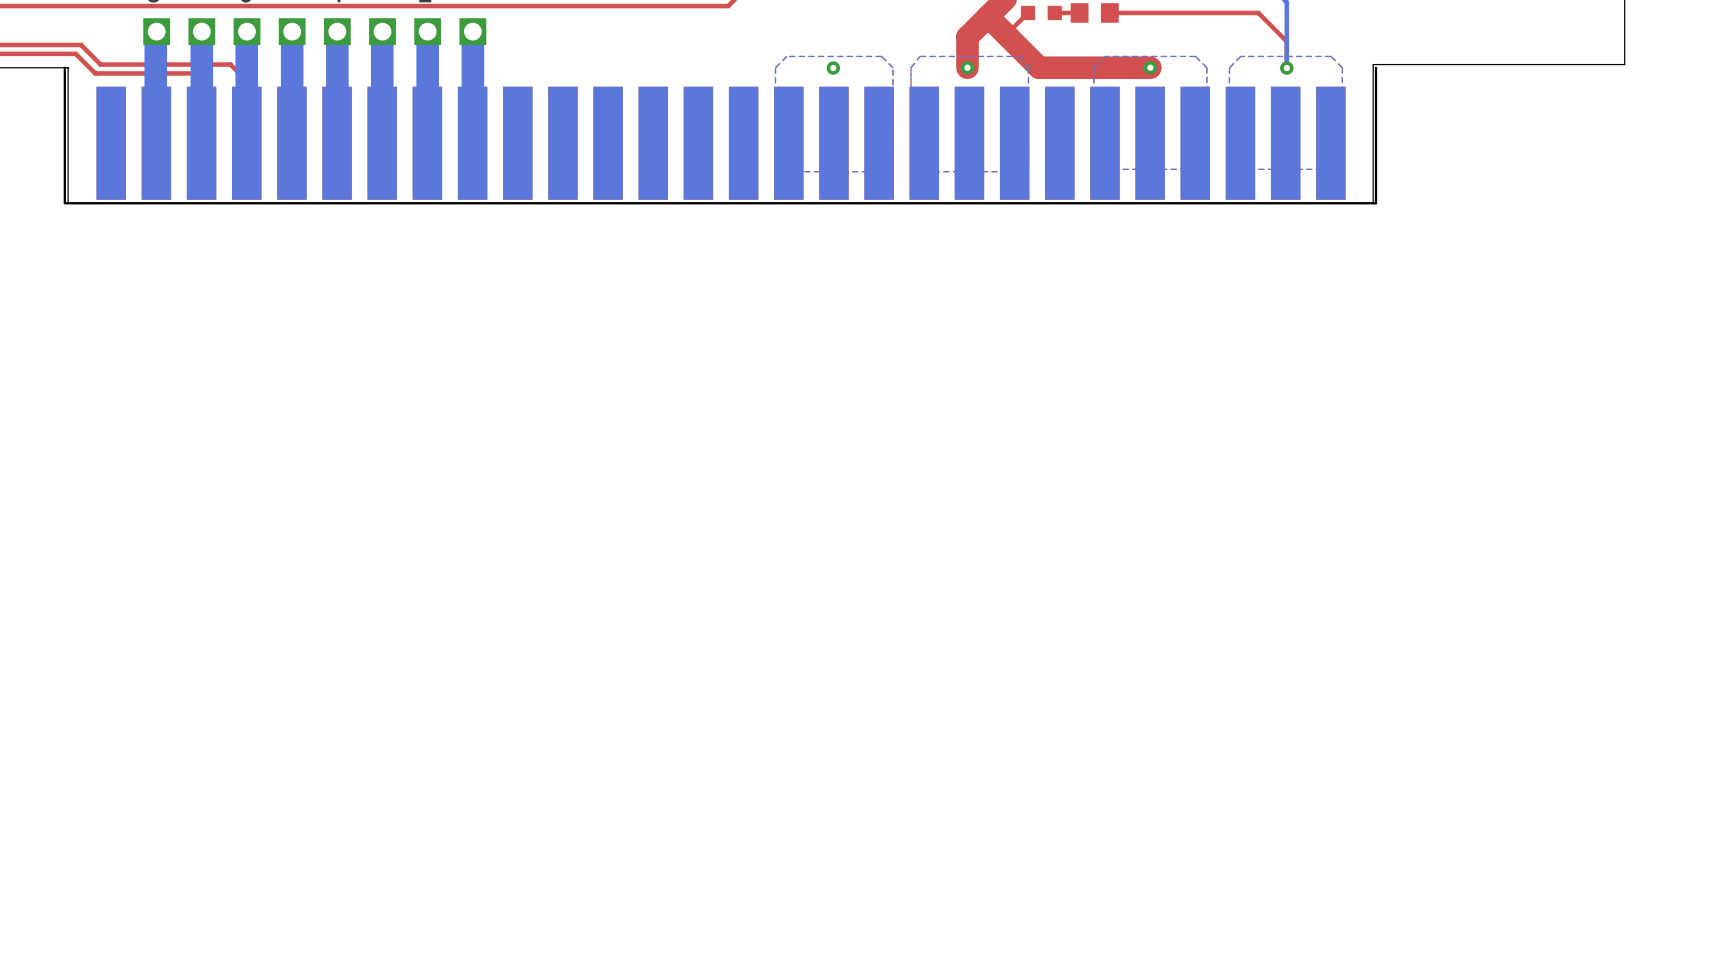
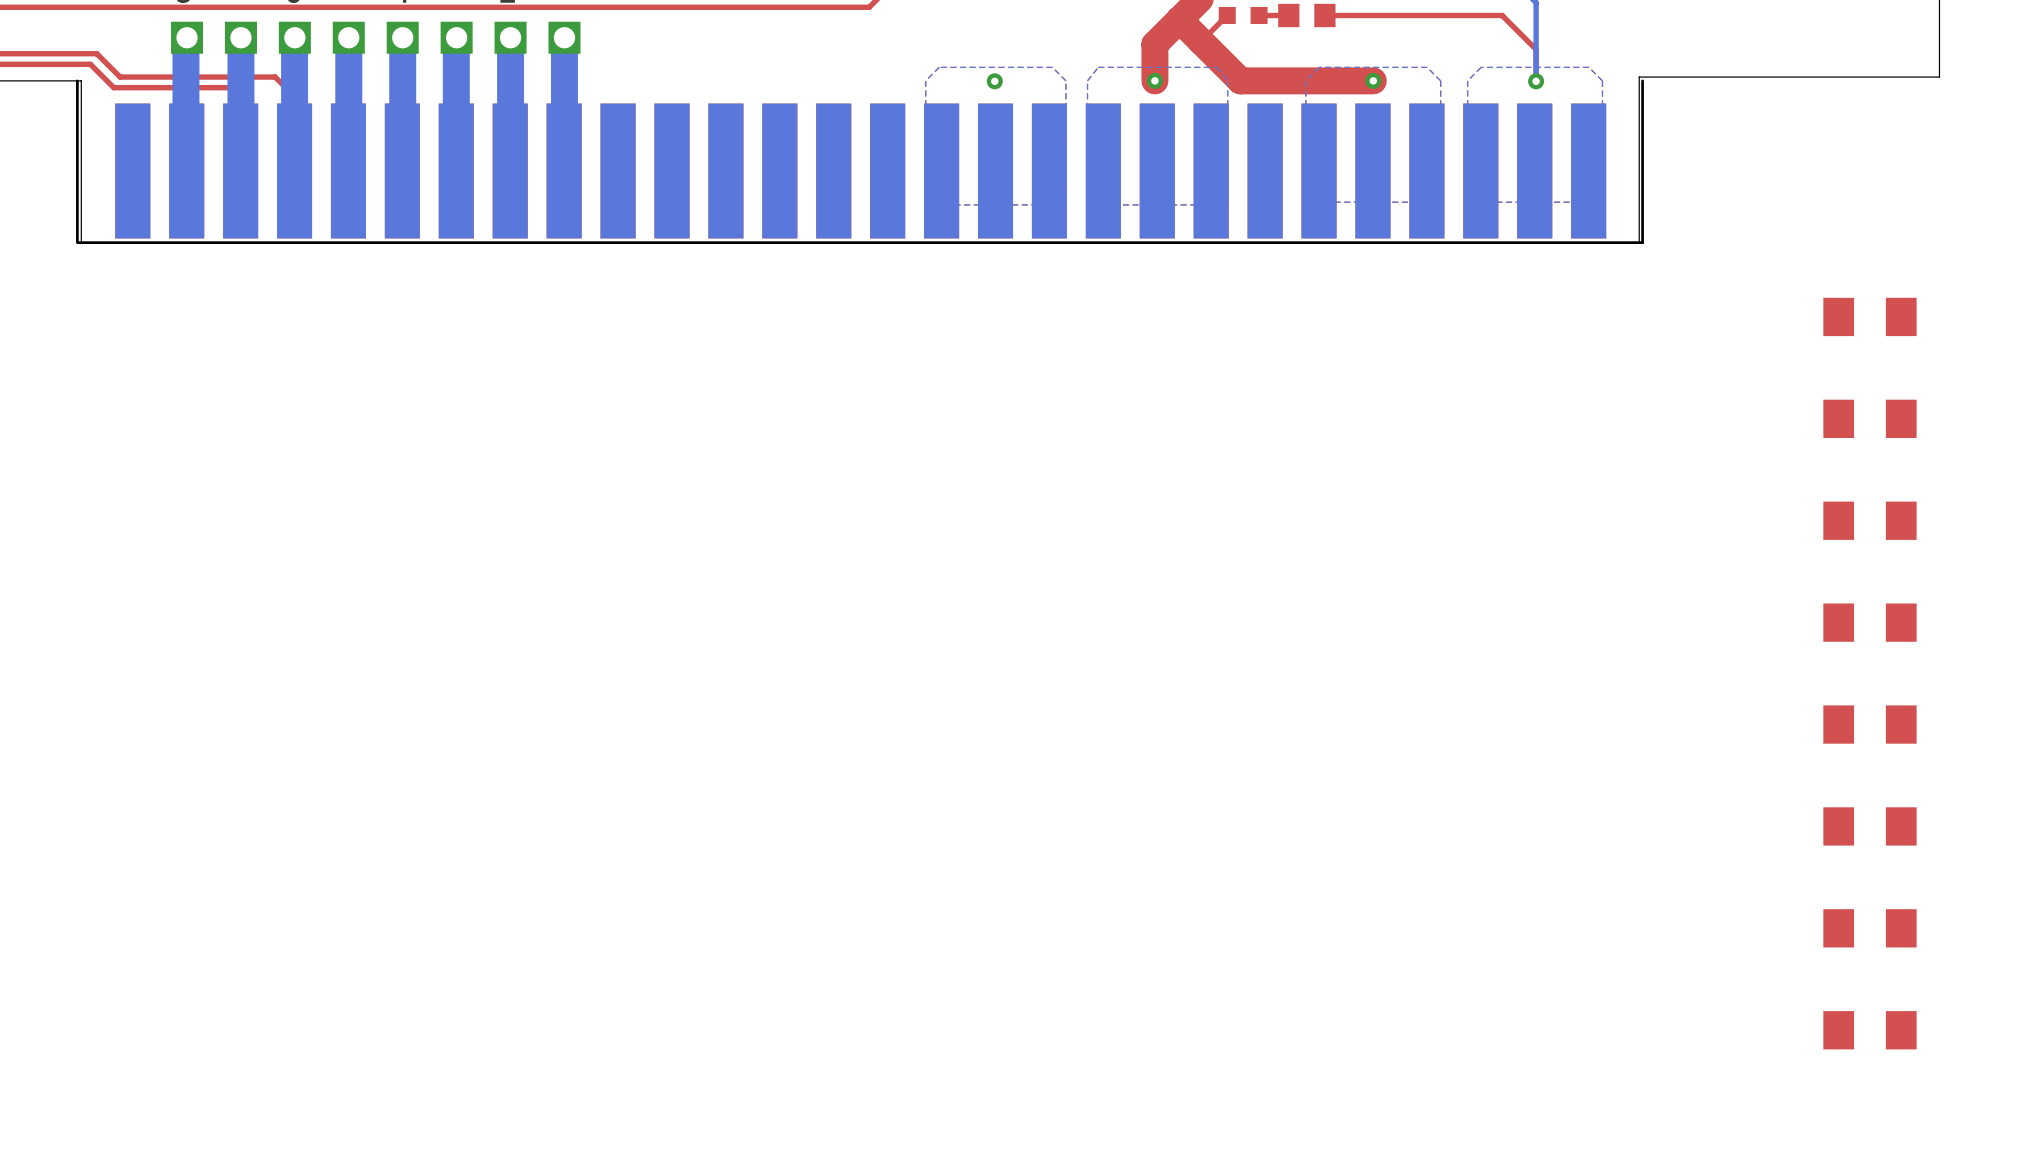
part: none -> (1869, 316)
part: none -> (1869, 418)
part: none -> (1869, 520)
part: none -> (1869, 622)
part: none -> (1869, 724)
part: none -> (1869, 826)
part: none -> (1869, 928)
part: none -> (1869, 1030)

